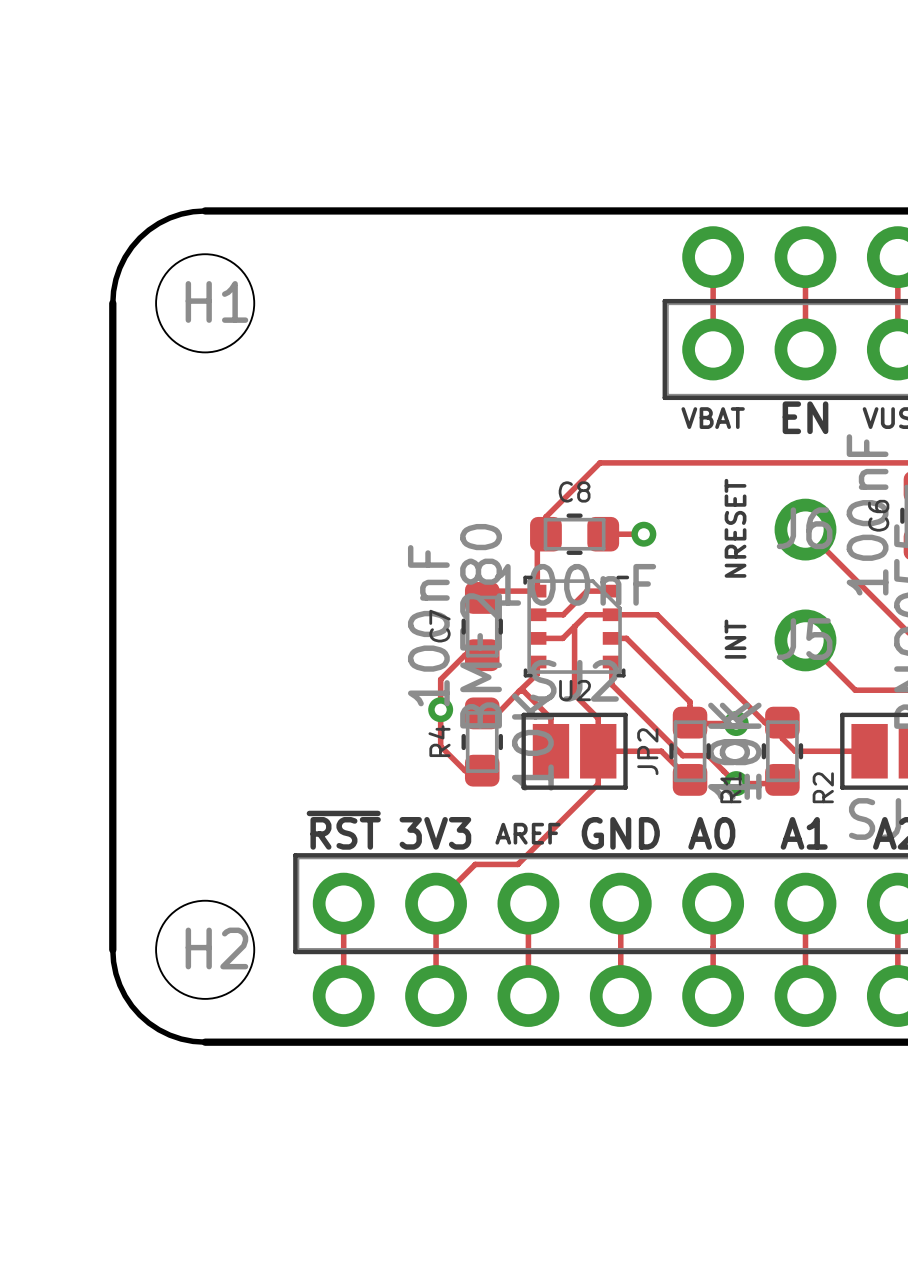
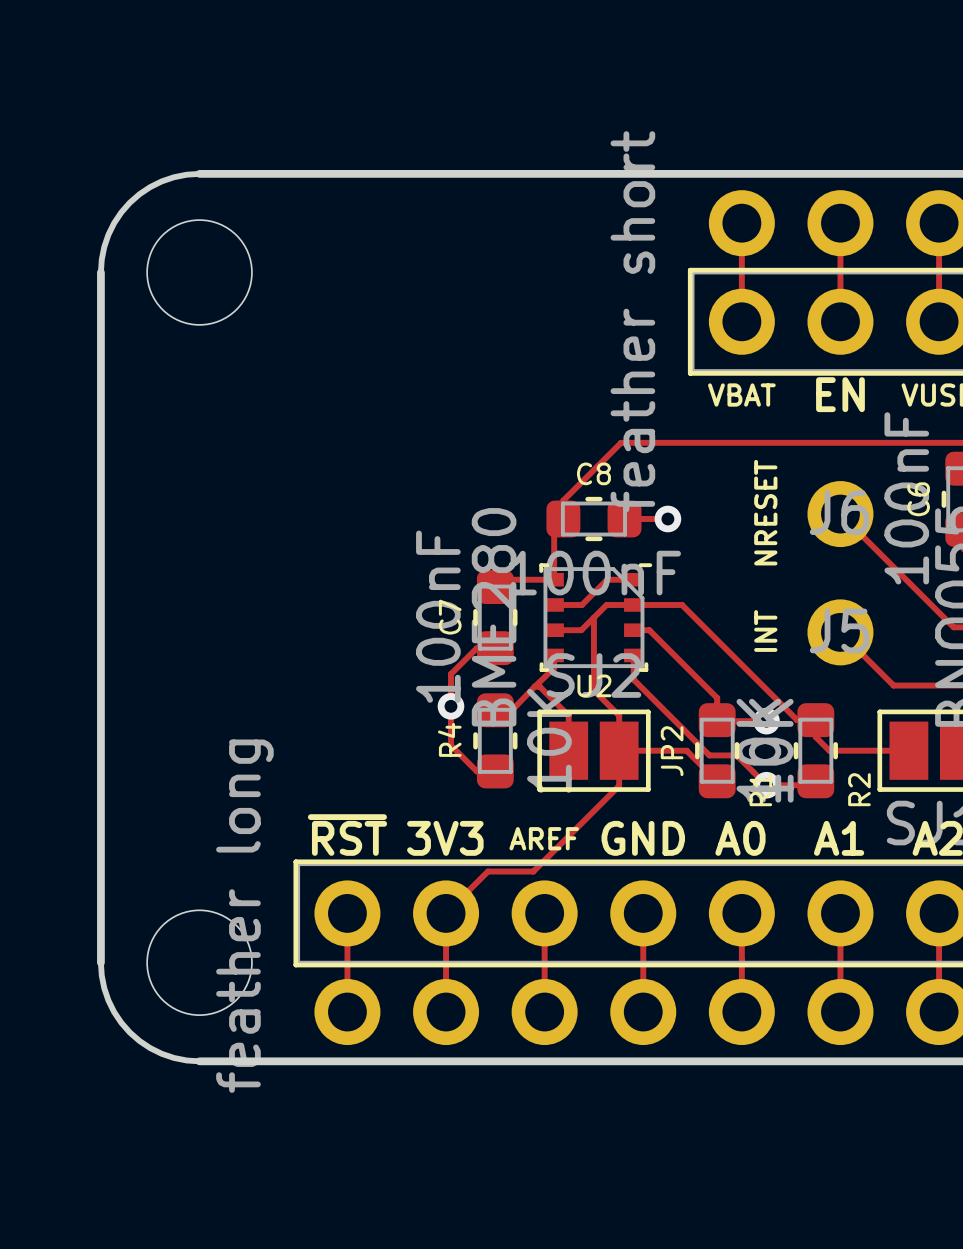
H1 name: H1 (216, 301) -> none
part value: none -> feather short (632, 321)
part value: none -> feather long (244, 916)
H2 name: H2 (216, 948) -> none

